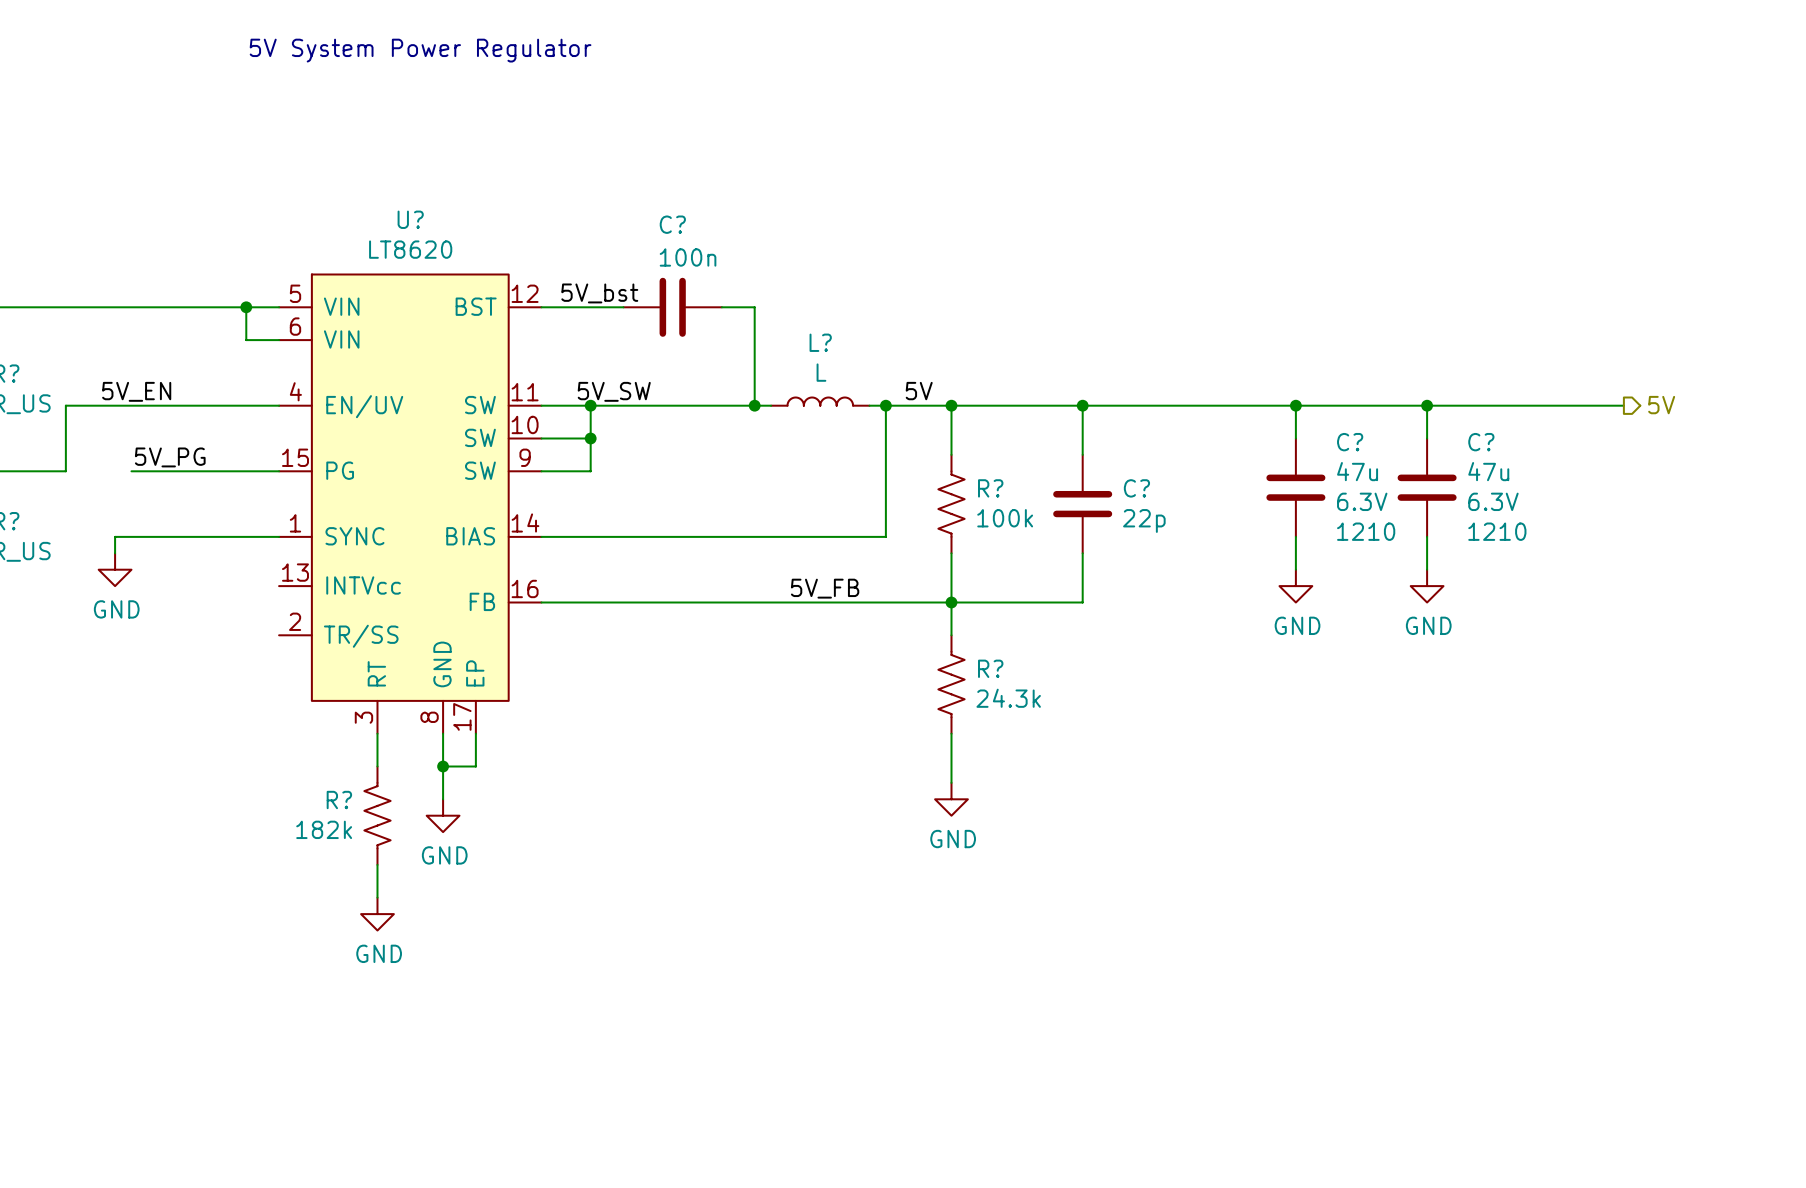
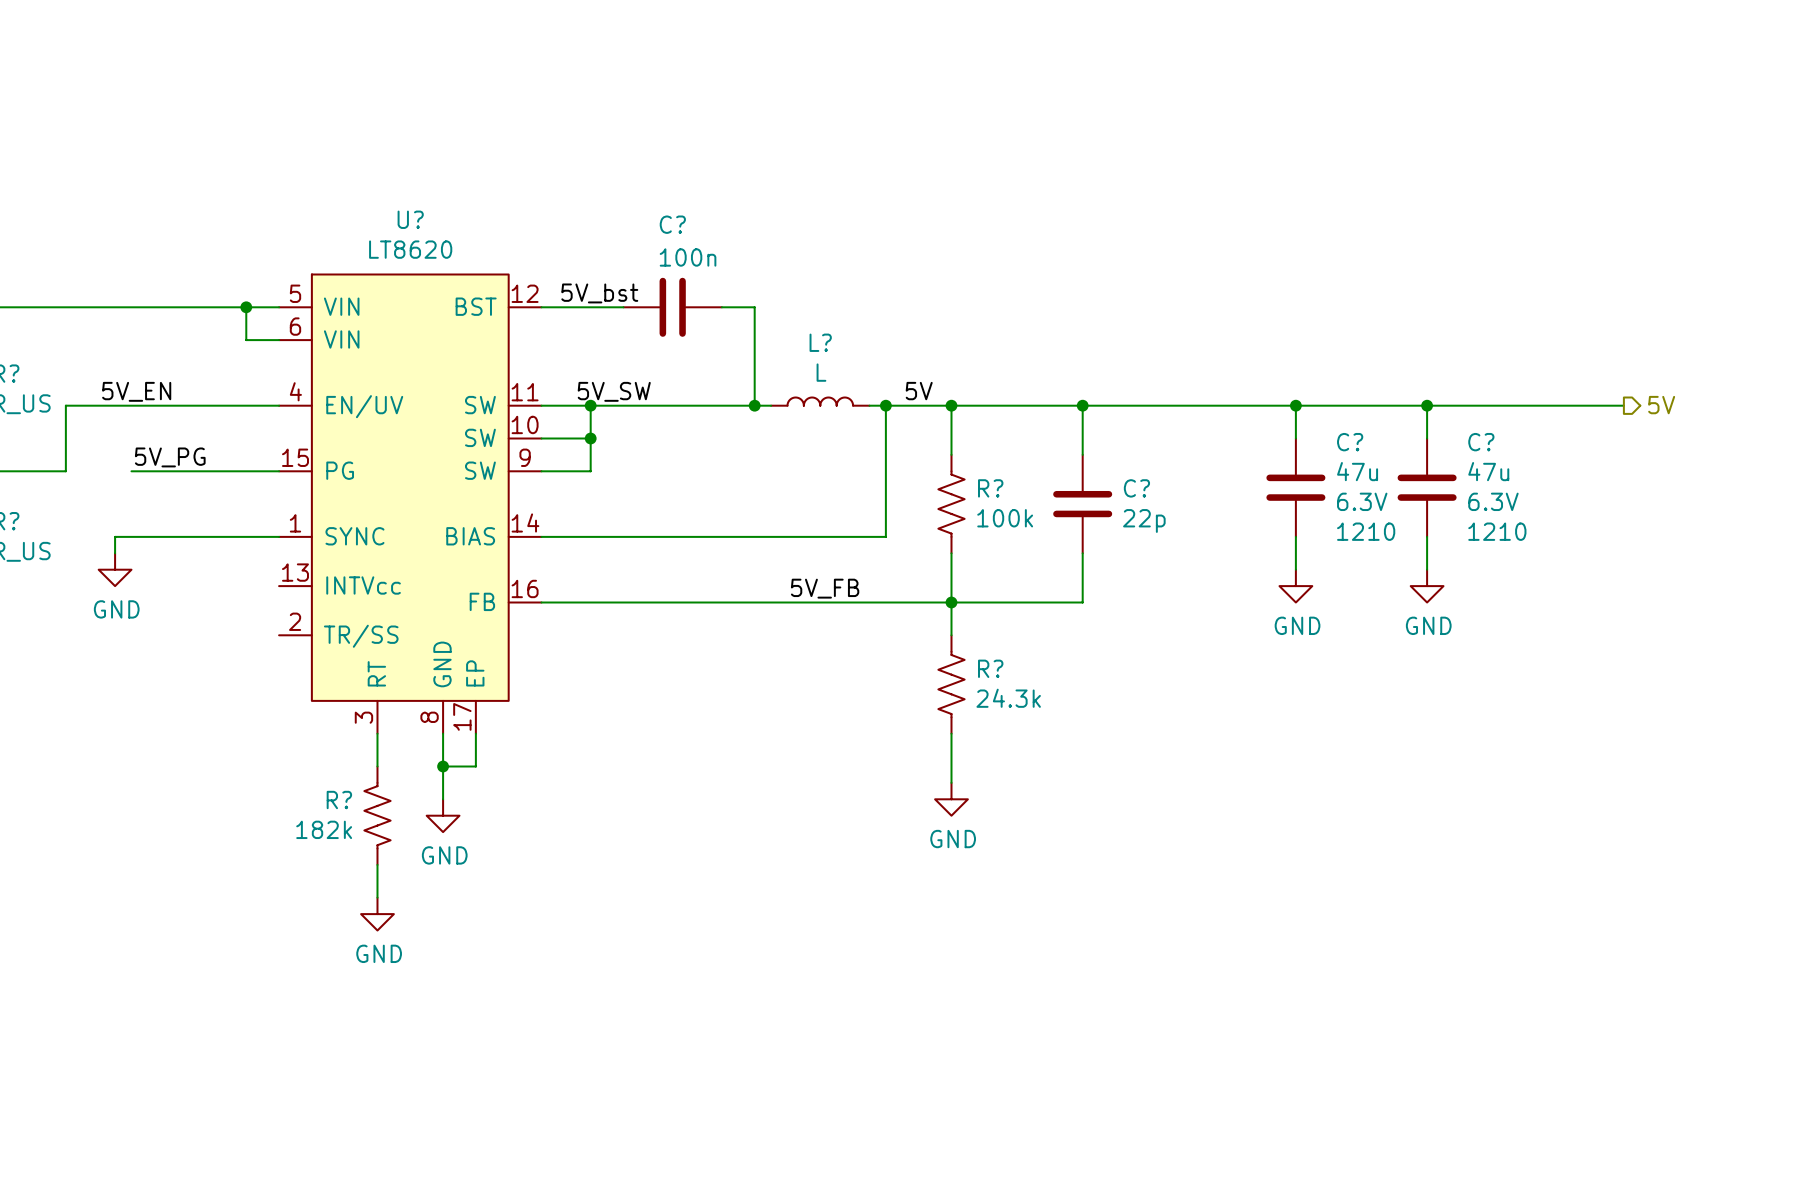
text: 5V System Power Regulator (420, 50) -> none

